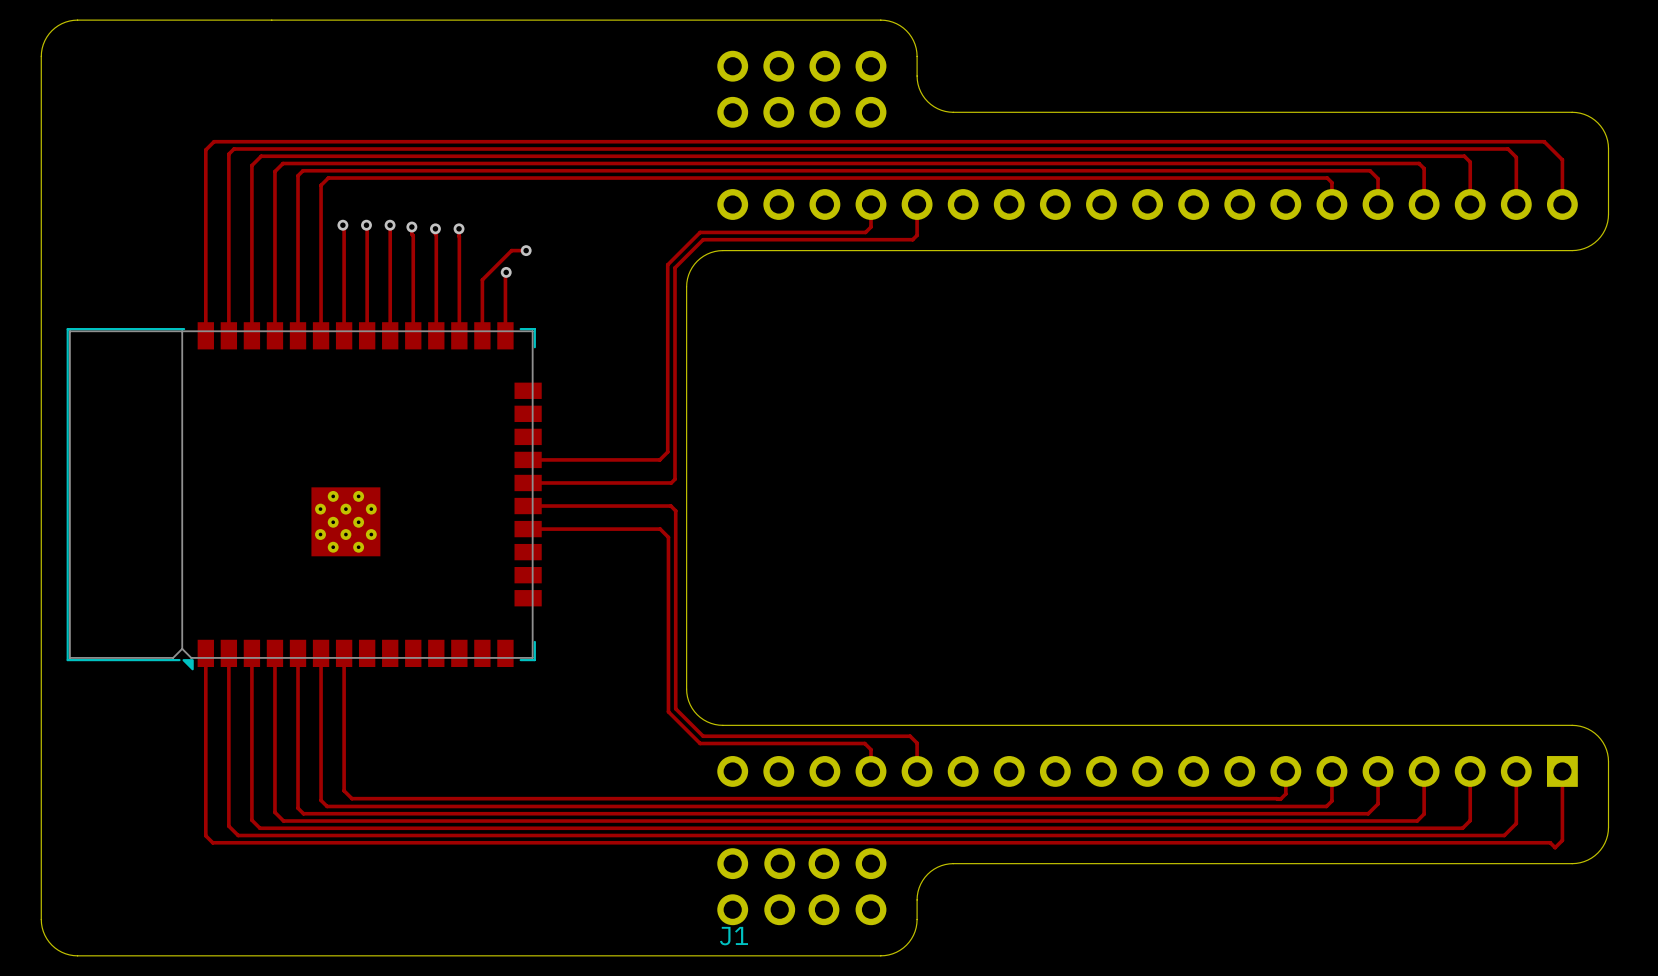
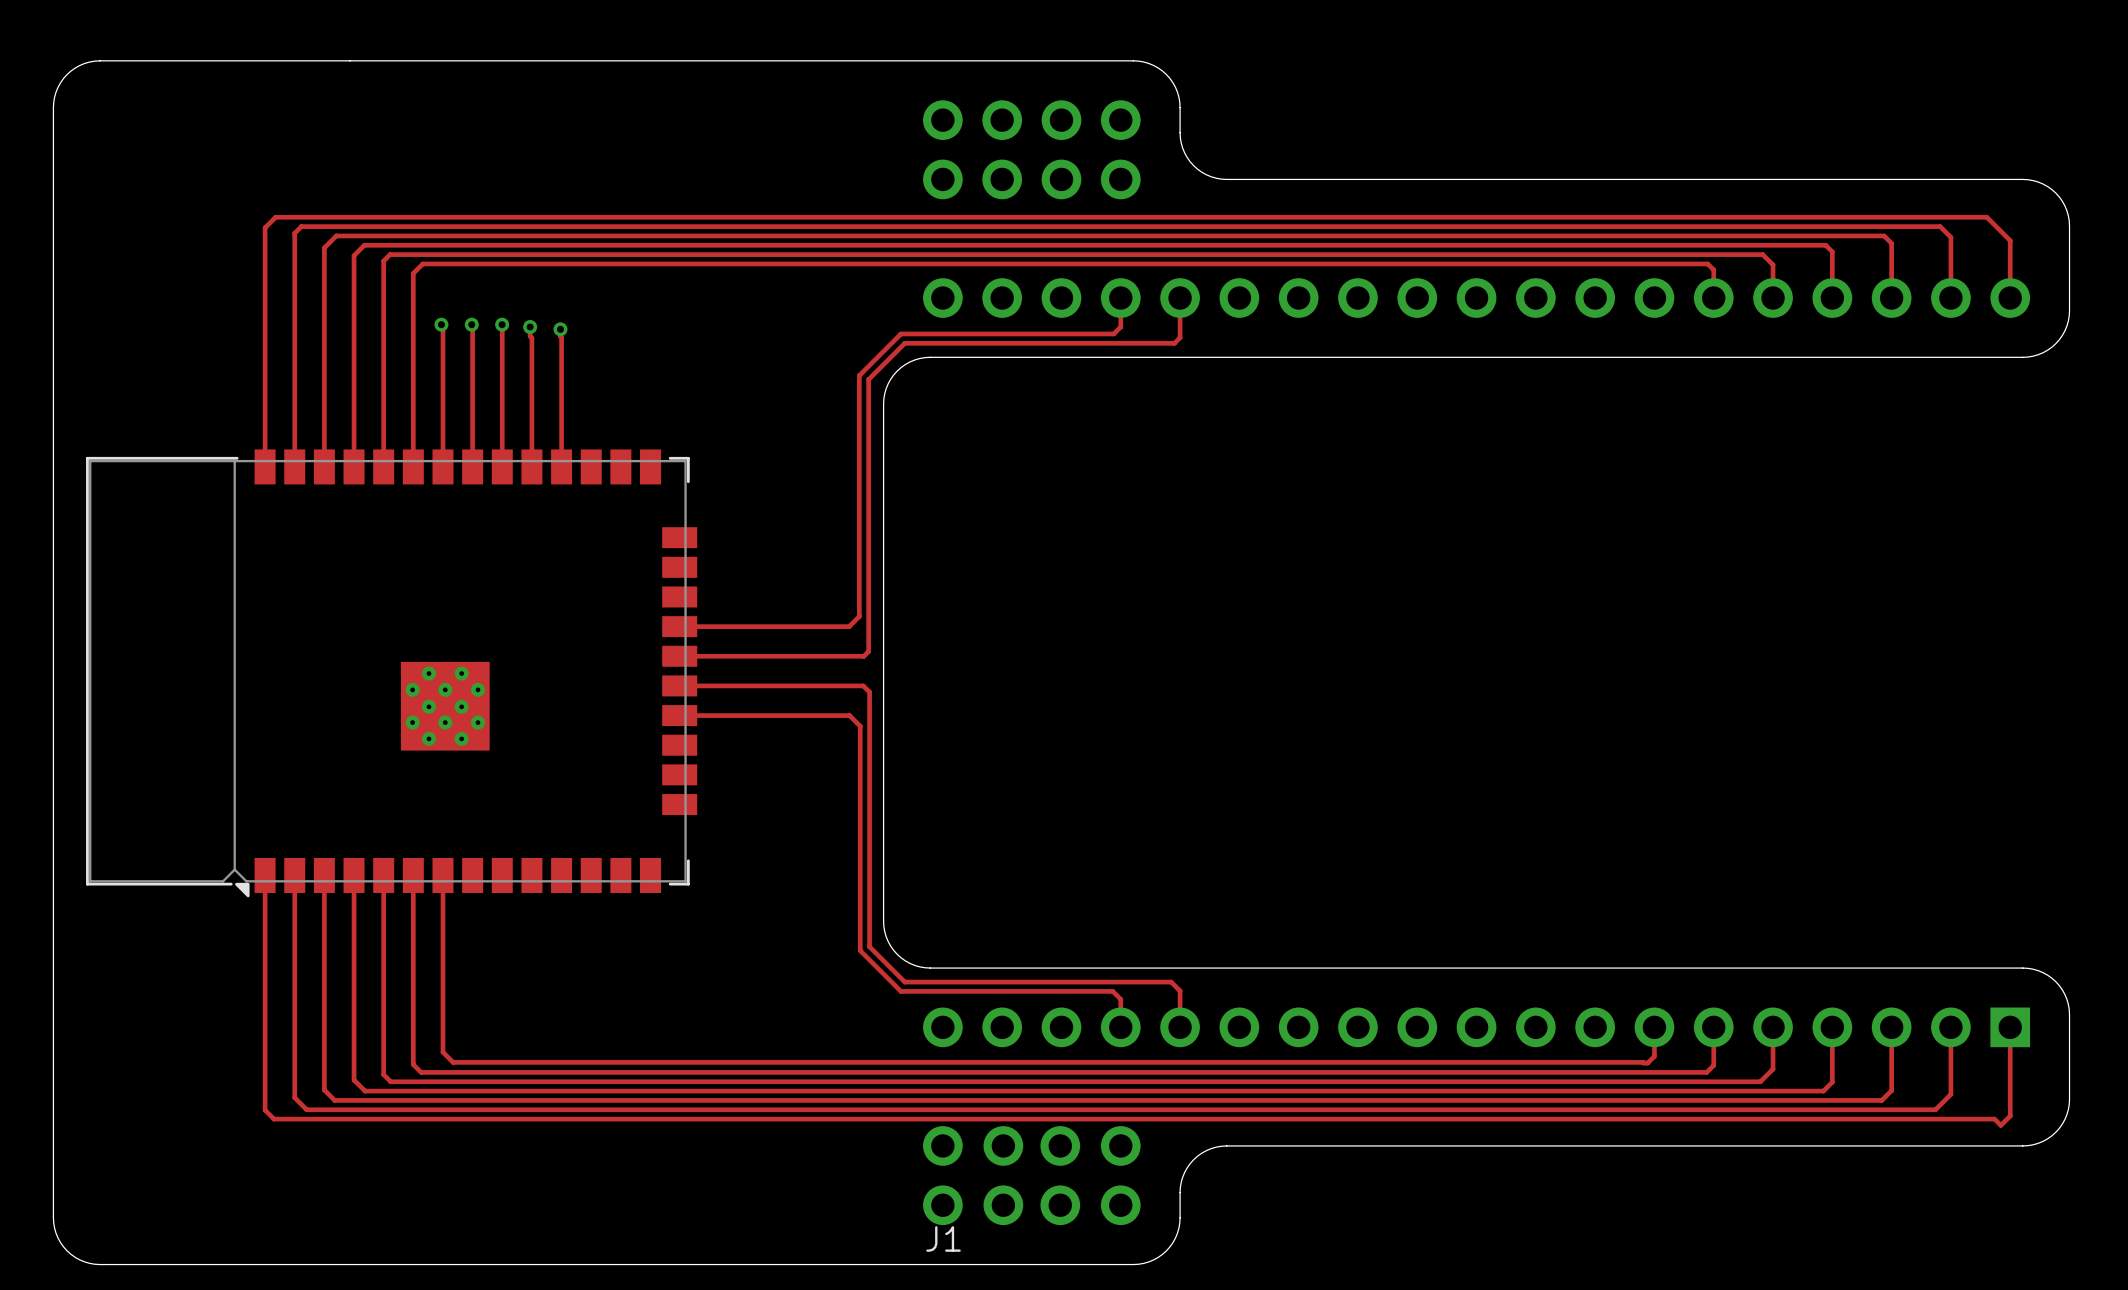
track: (459, 228) (459, 335) -> none
via: (459, 228) -> none
track: (526, 250) (511, 250) (482, 279) (482, 335) -> none
via: (526, 250) -> none
track: (506, 272) (505, 335) -> none
via: (506, 272) -> none

